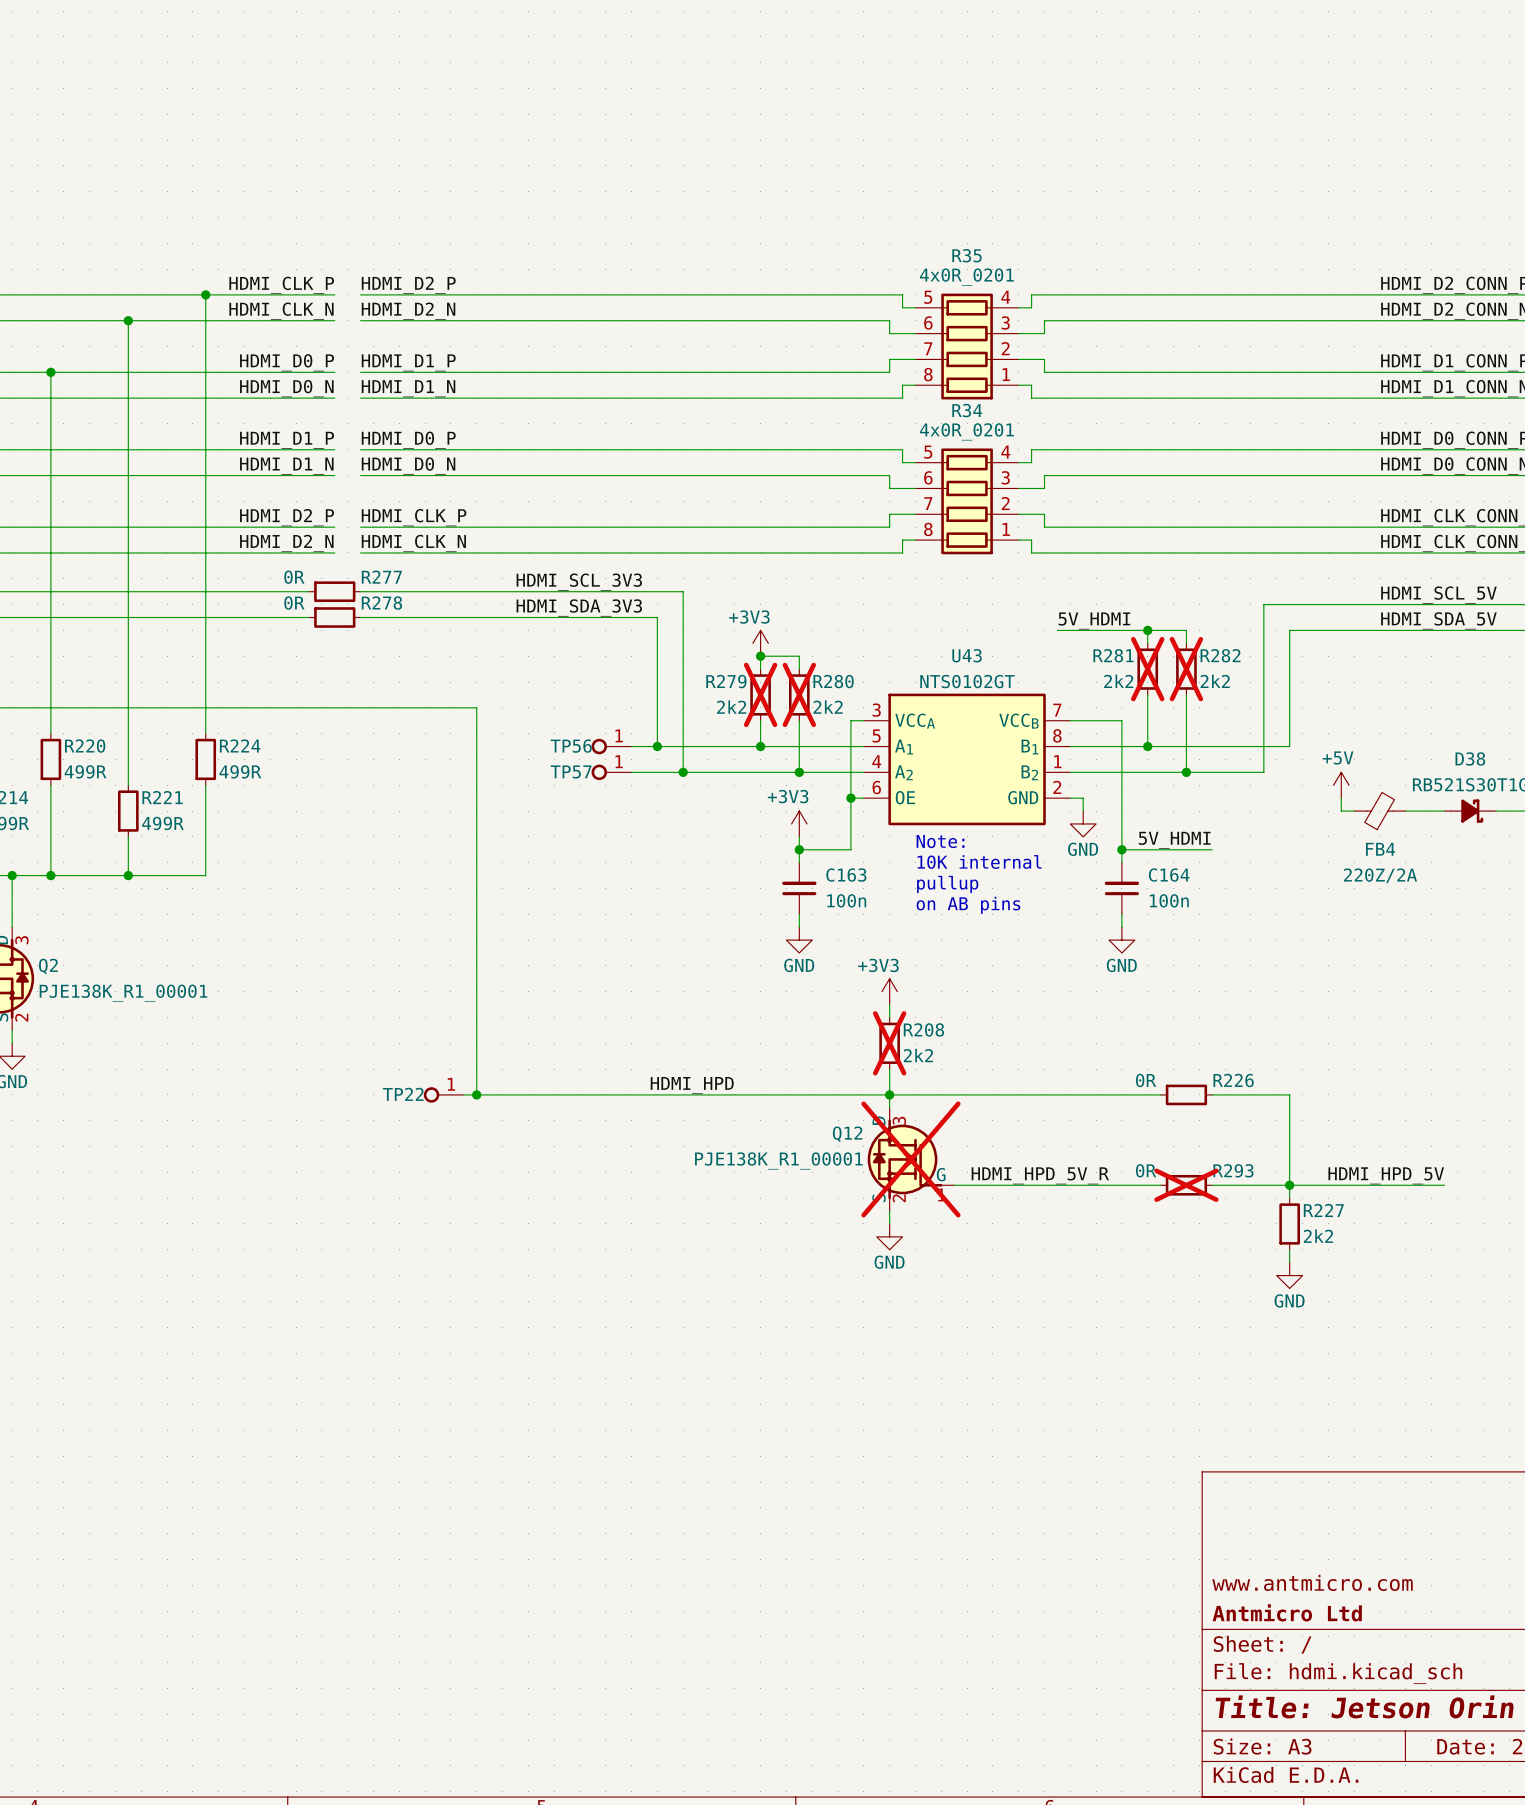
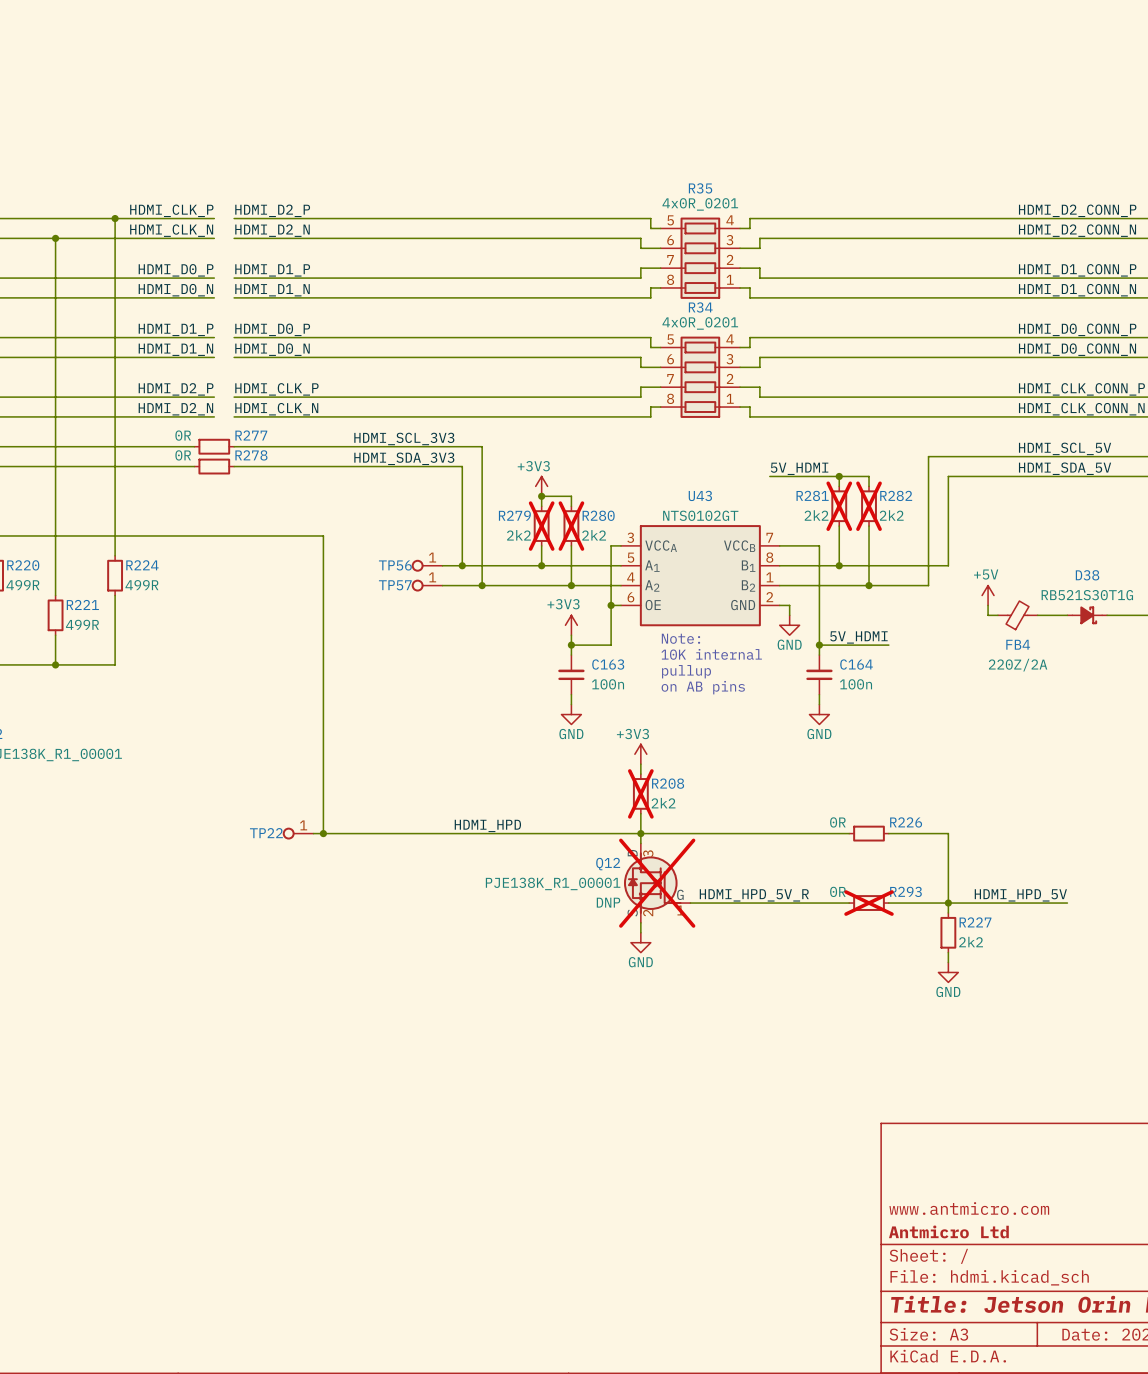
Q12 text: none -> DNP (608, 902)

